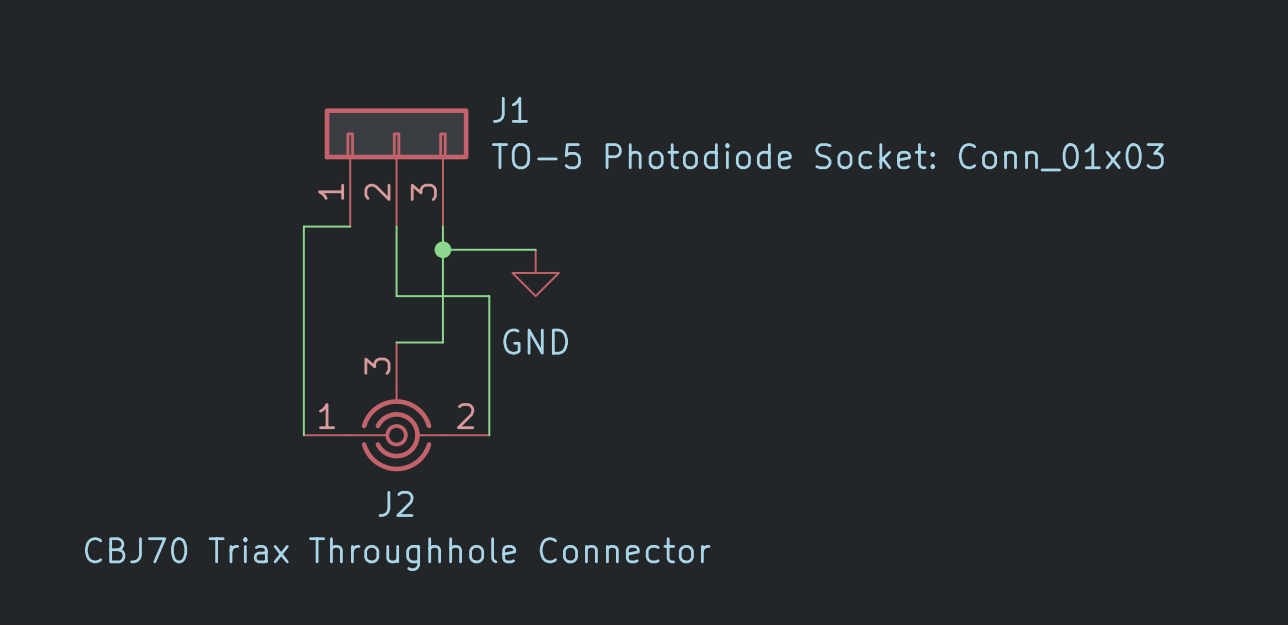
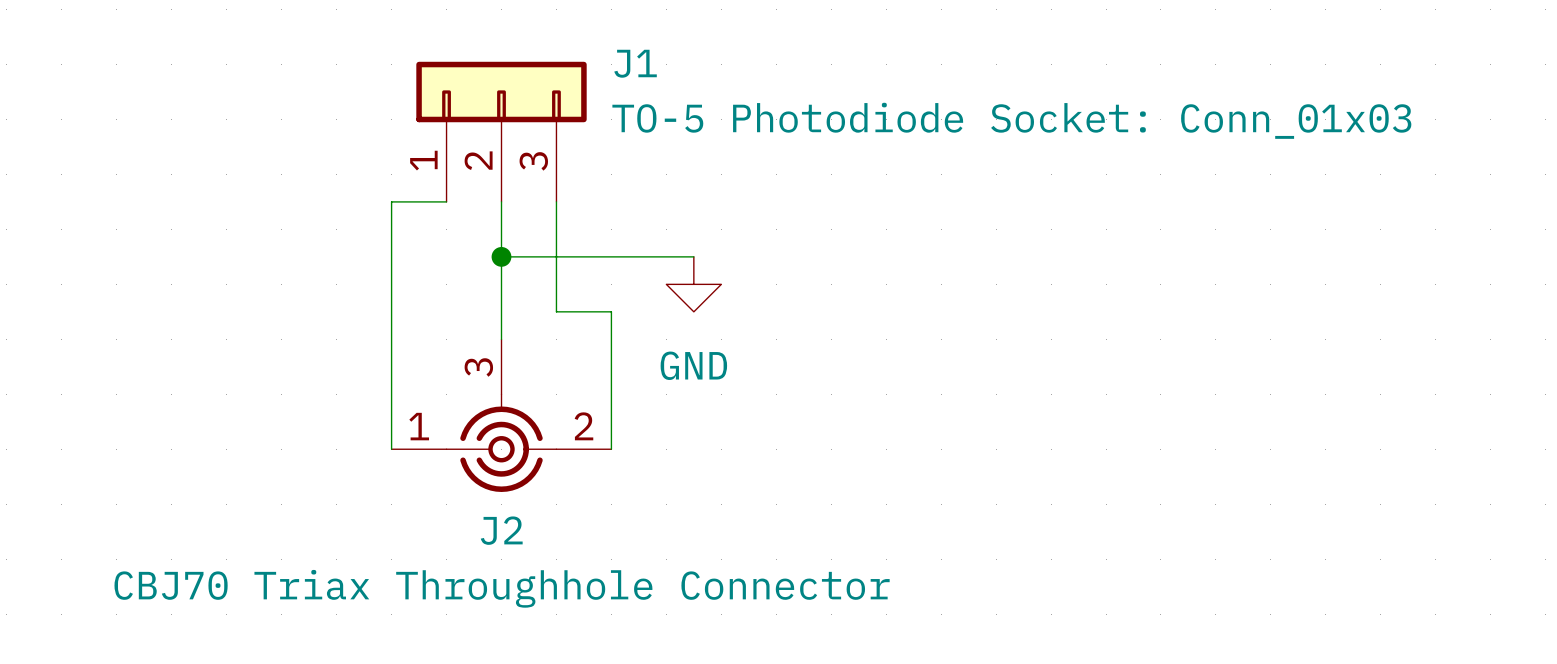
wire: (442, 249) (535, 249) -> none
junction position: (442, 249) -> (501, 256)
wire: none -> (501, 256) (693, 256)
power symbol position: GND (535, 272) -> GND (693, 284)
wire: (396, 296) (489, 296) (489, 319) -> (556, 311) (611, 311)
wire: (442, 319) (442, 342) (396, 342) -> (501, 284) (501, 339)

